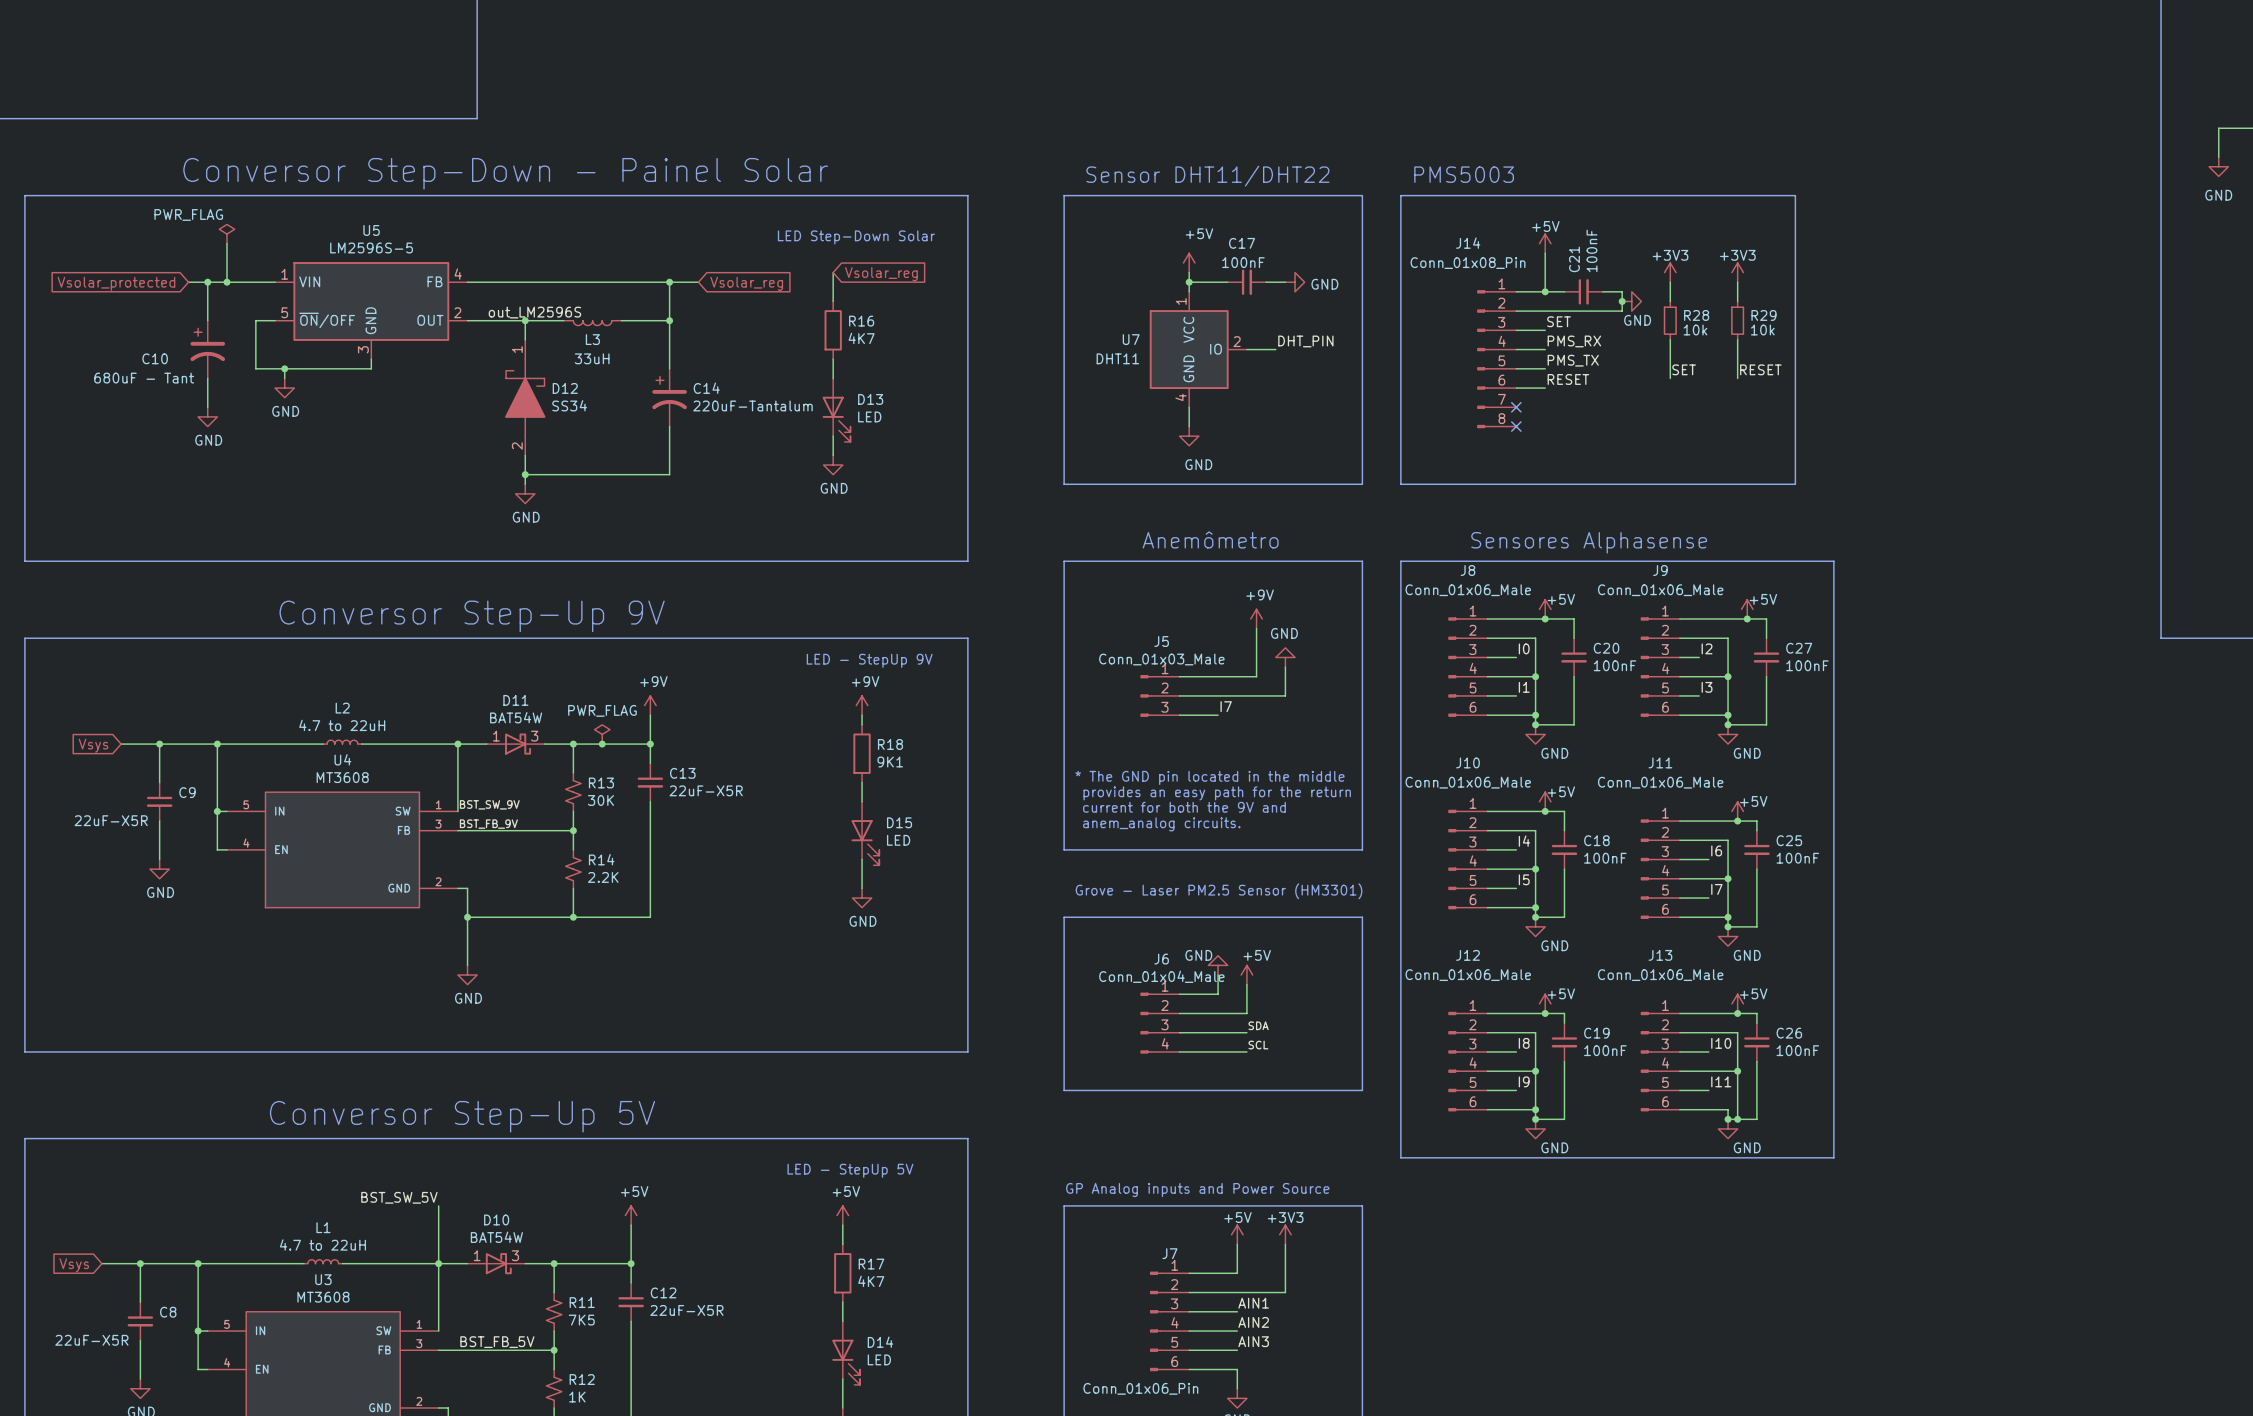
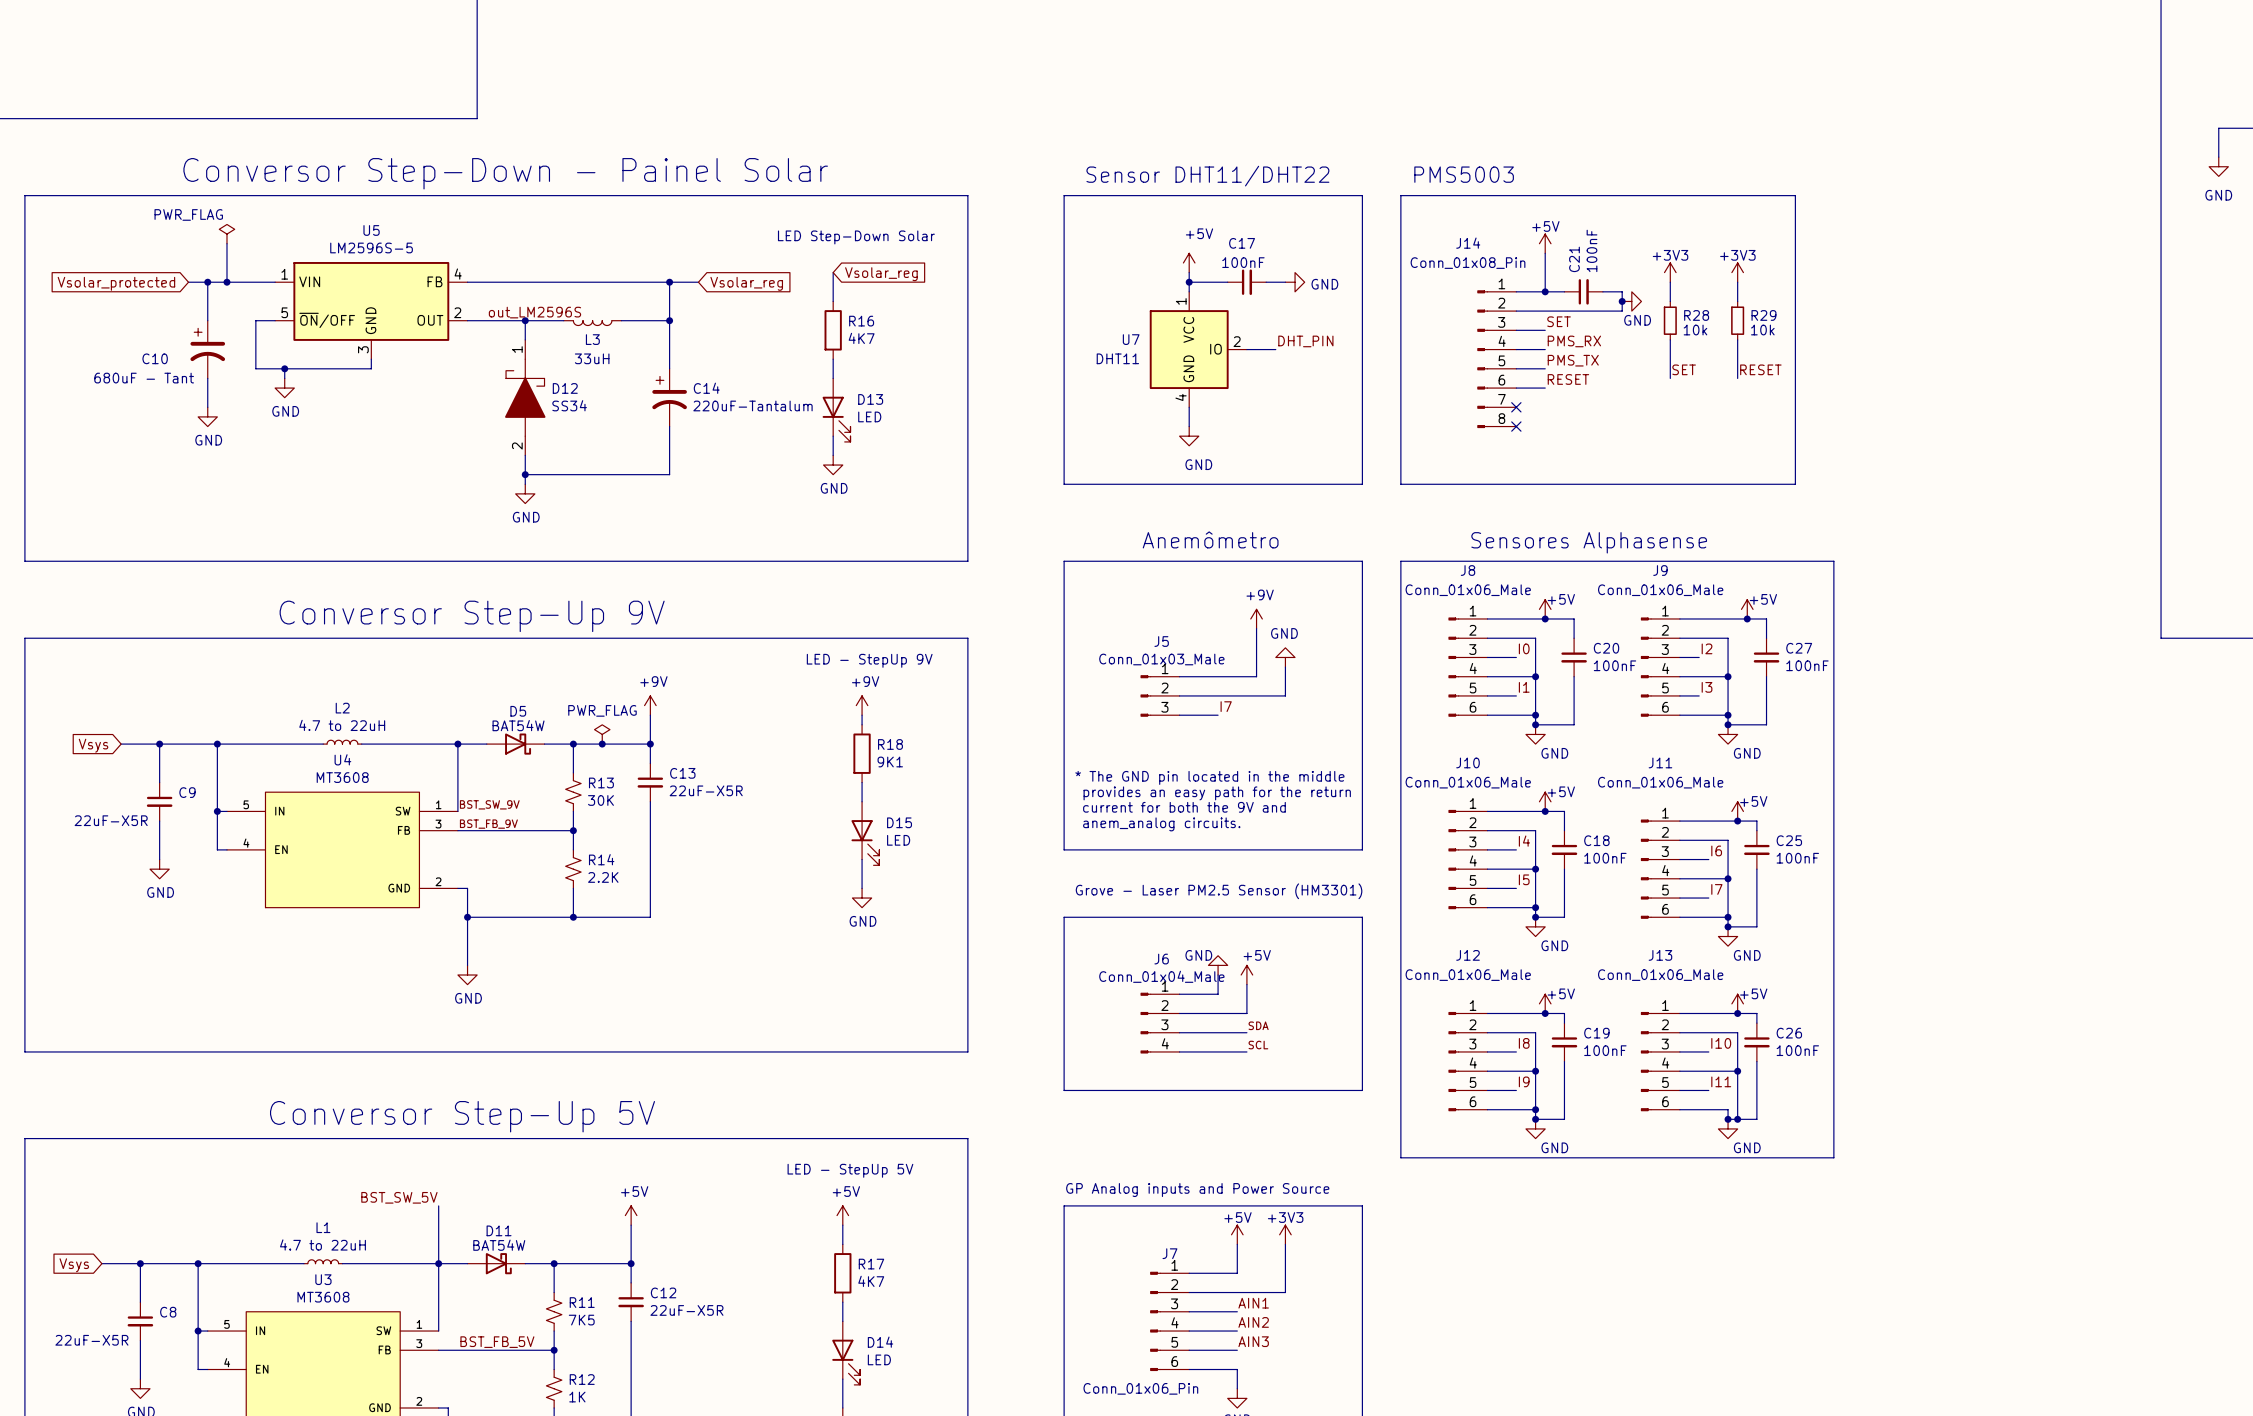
D11 name position: D11 (515, 700) -> D11 (499, 1230)
D11 value position: BAT54W (516, 717) -> BAT54W (499, 1245)
D11 pin number: 1 (496, 736) -> none
D11 pin number: 3 (534, 736) -> none
D11 position: (515, 744) -> (496, 1263)
D5: none -> BAT54W (515, 744)
D10: BAT54W (496, 1263) -> none

